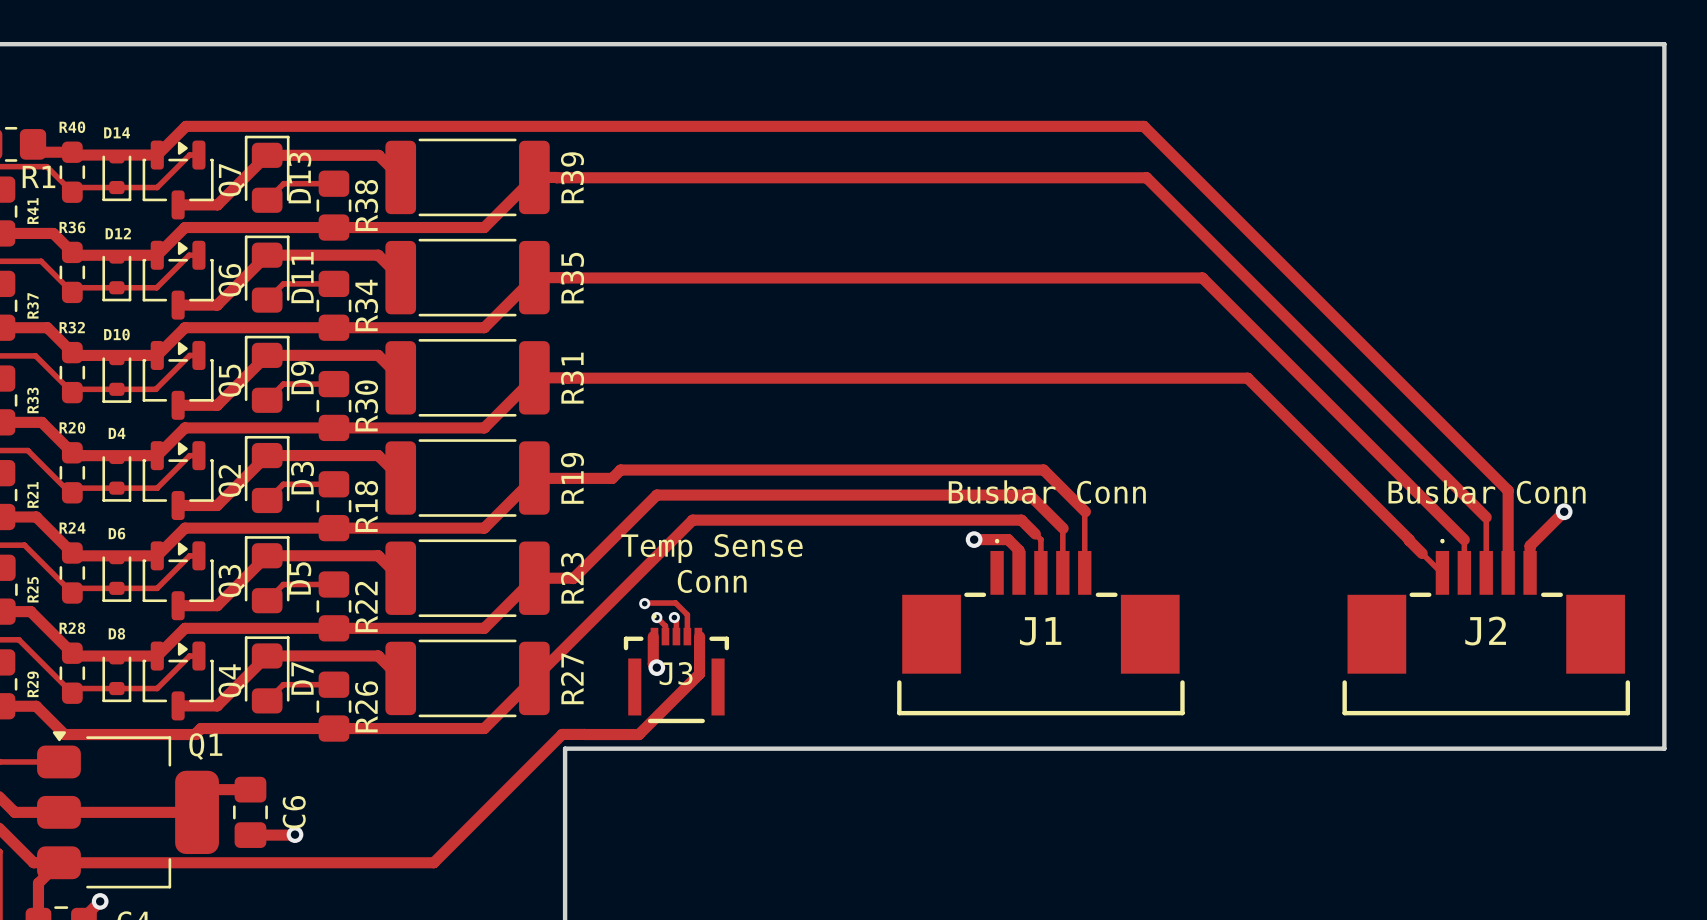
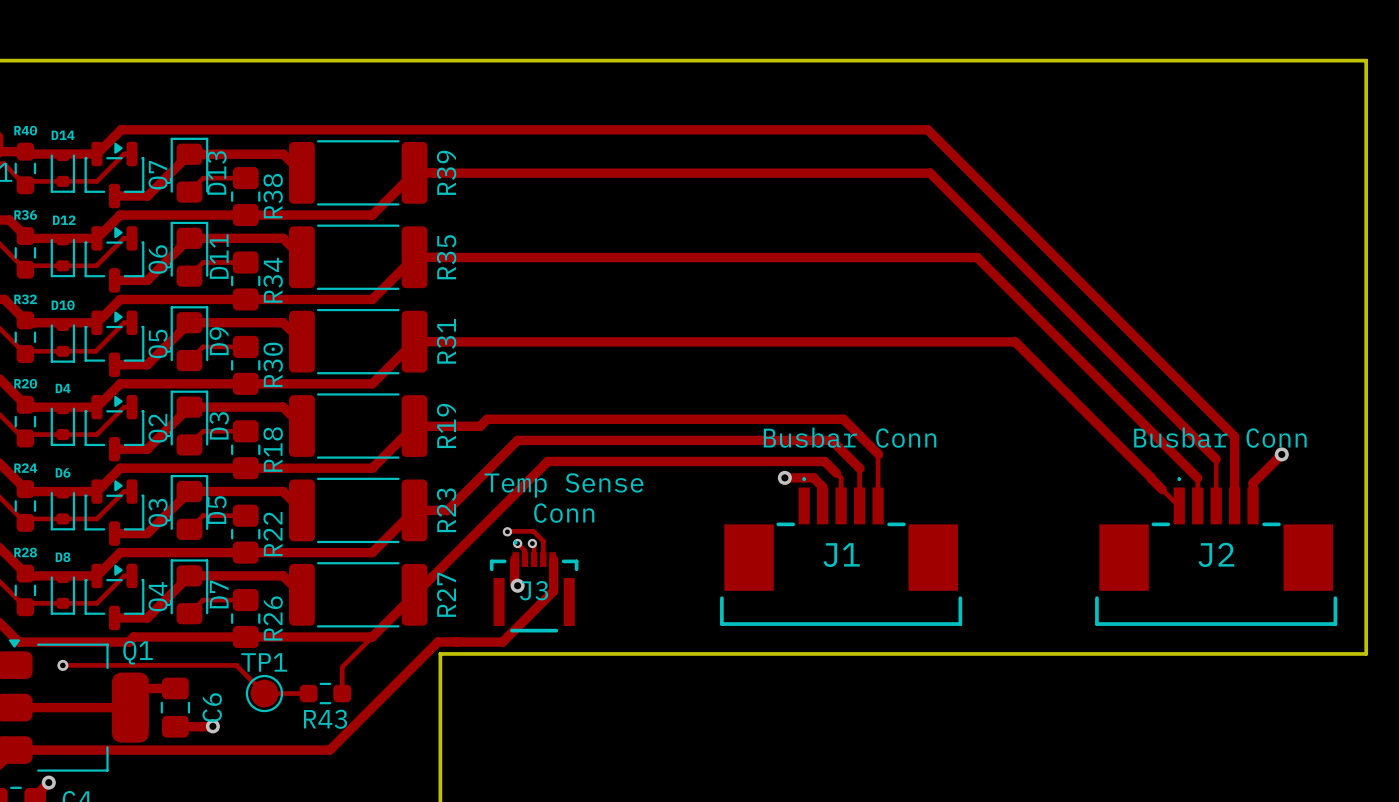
track: none -> (372, 636) (342, 667) (342, 693)
track: none -> (62, 665) (236, 665) (264, 693) (308, 693)
via: none -> (62, 665)
TP1: none -> (264, 693)
R43: none -> (325, 693)

